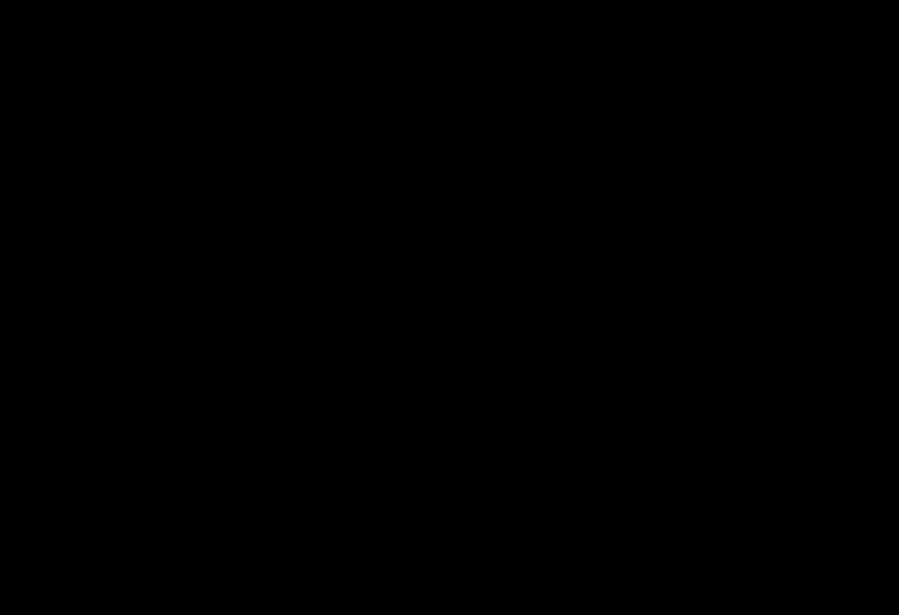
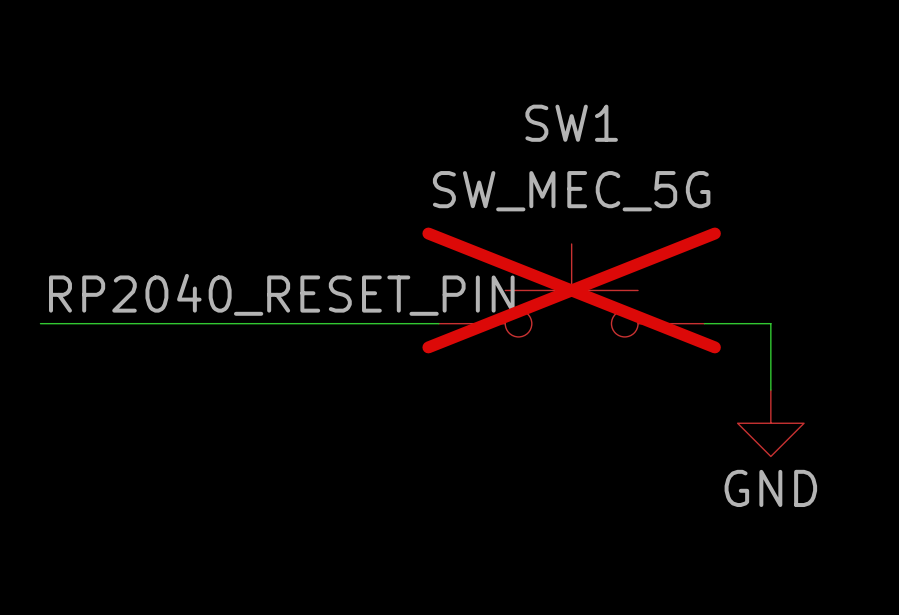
SW1: none -> SW_MEC_5G (571, 290)
label: none -> RP2040_RESET_PIN (281, 294)
wire: none -> (40, 323) (438, 323)
wire: none -> (704, 323) (770, 323) (770, 390)
power symbol: none -> GND (770, 423)

